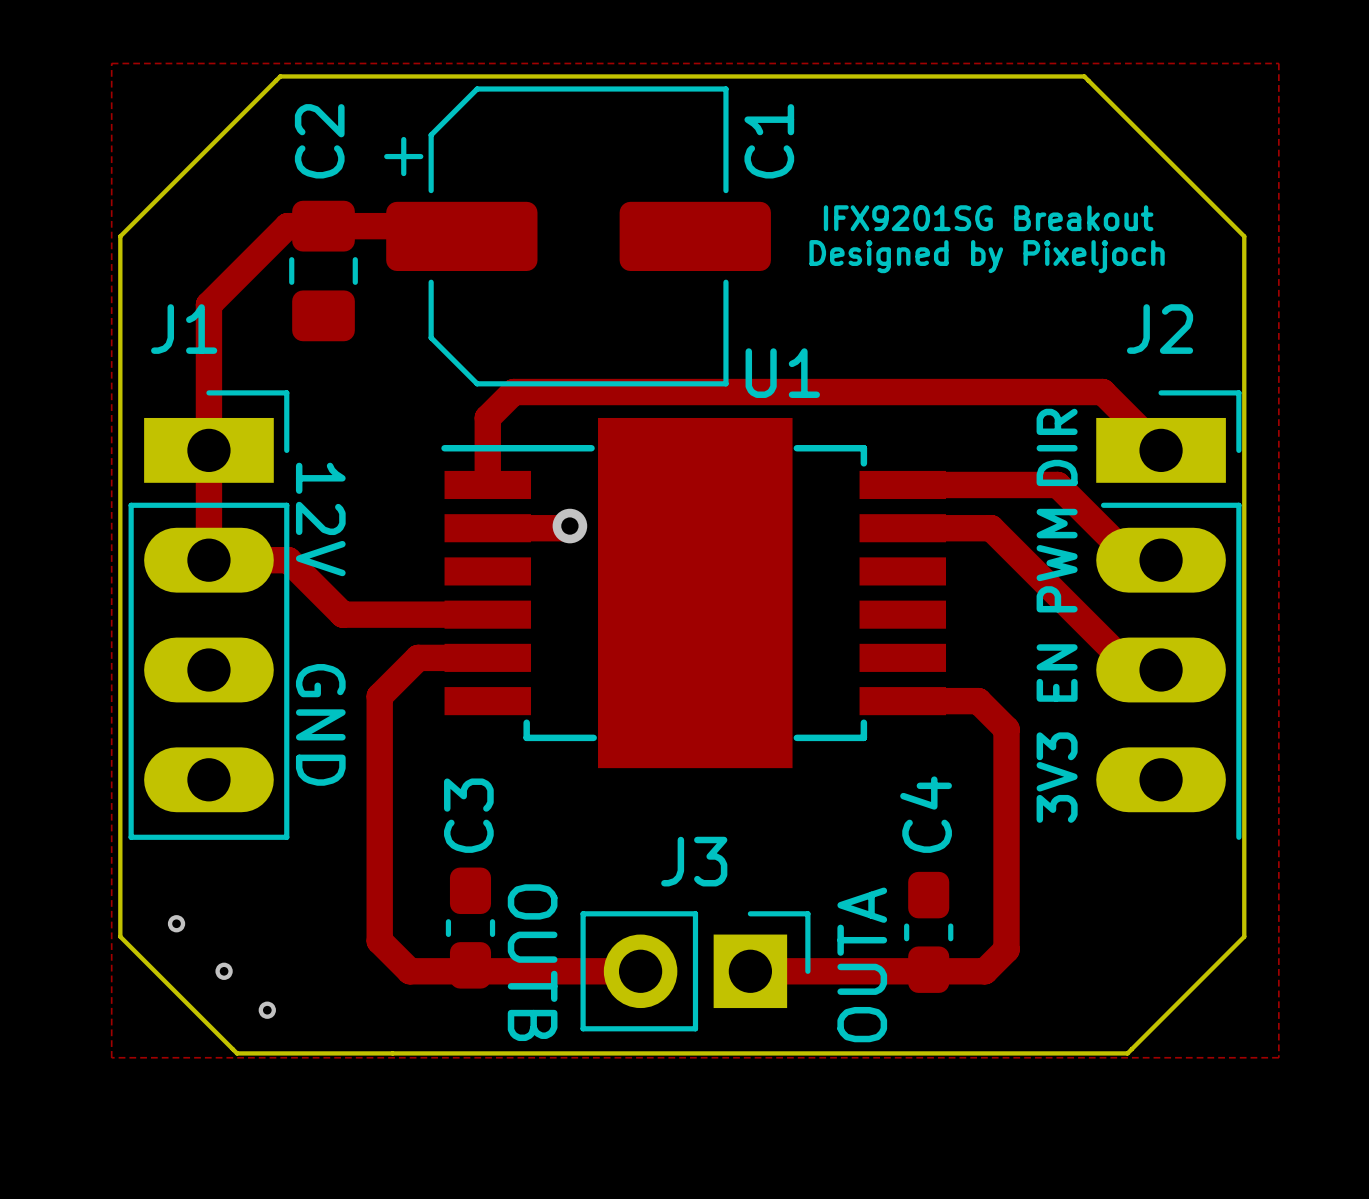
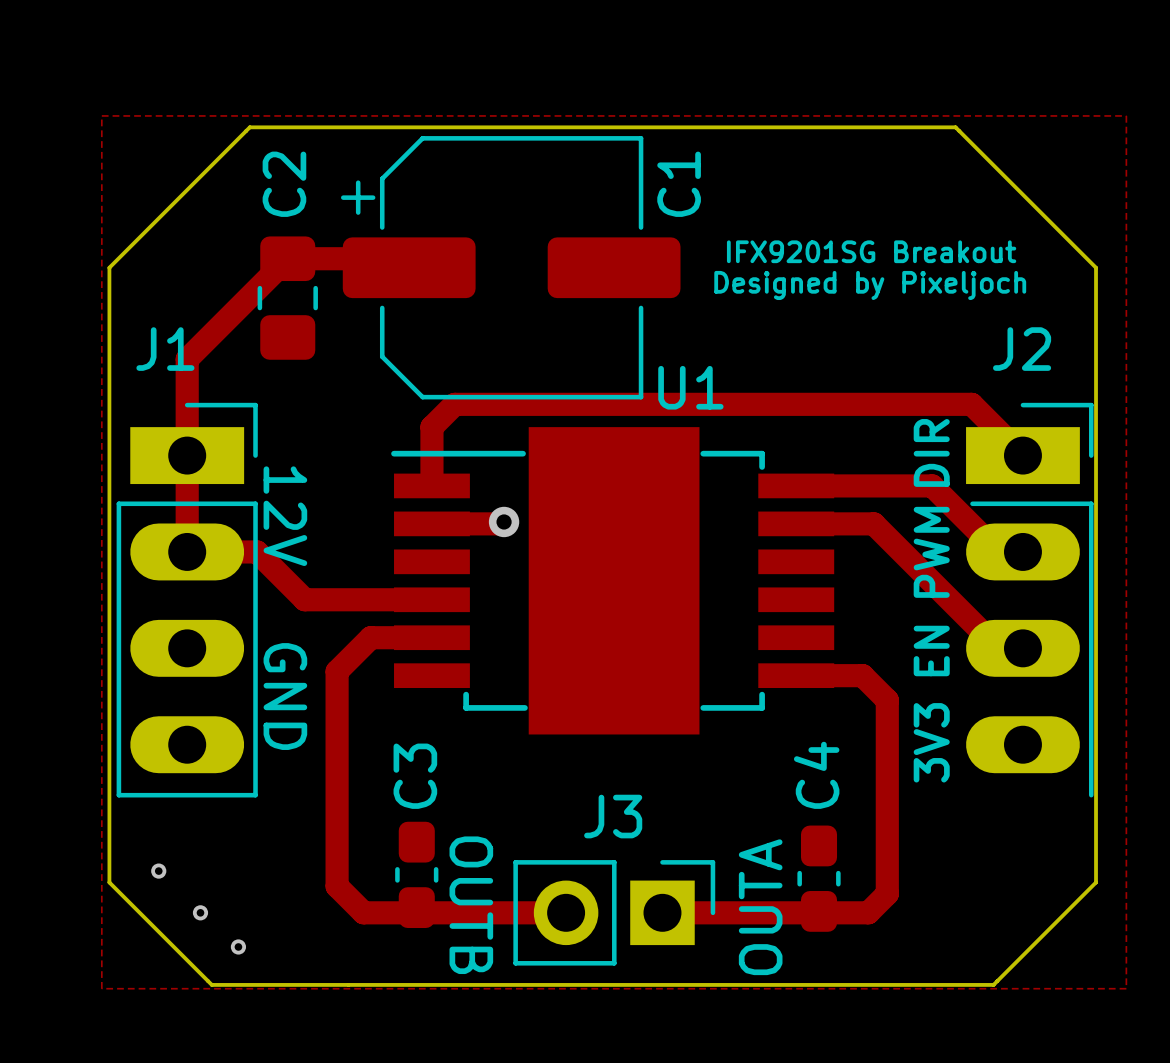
track: (323, 226) (287, 226) (208, 304) (208, 340) -> (287, 258) (187, 359)

